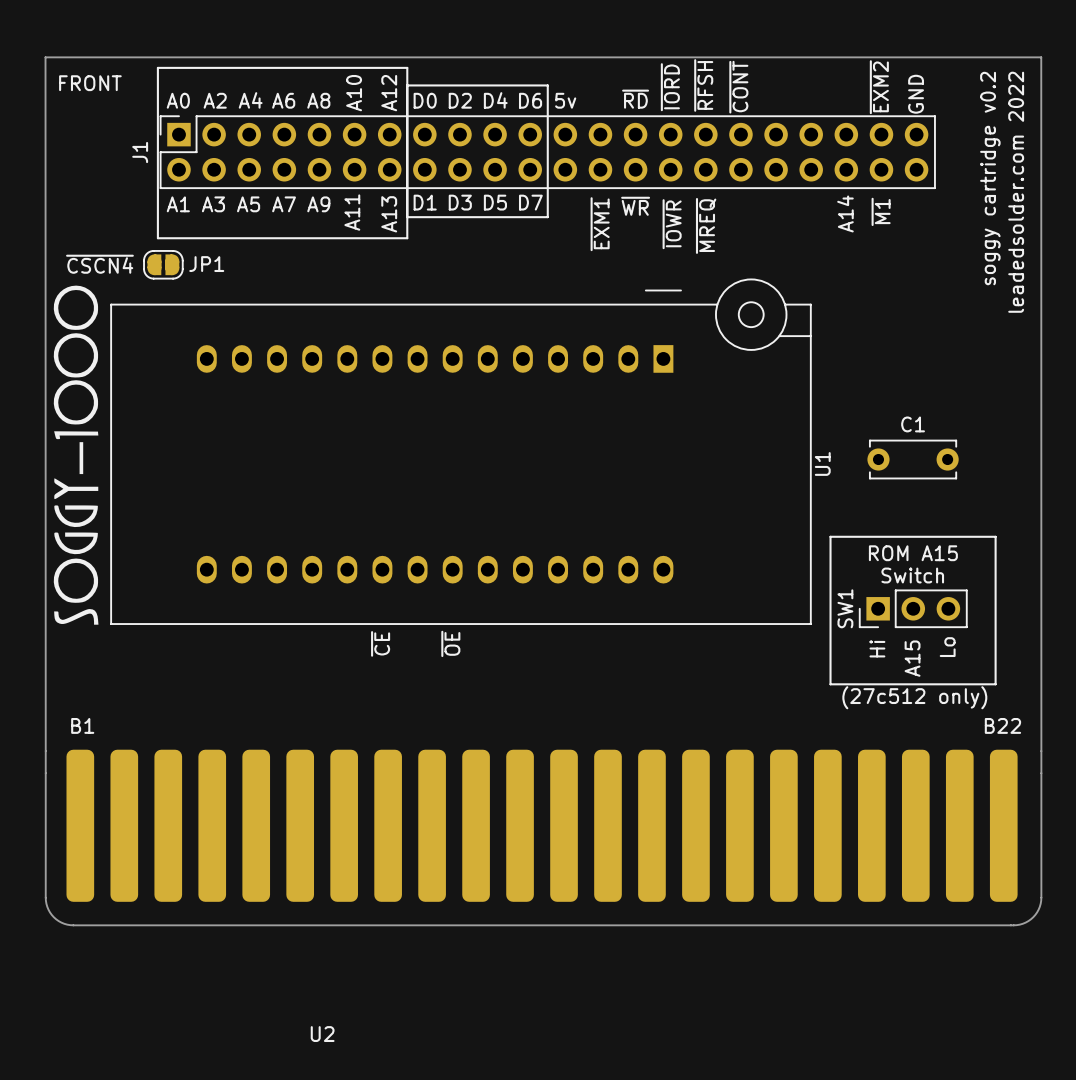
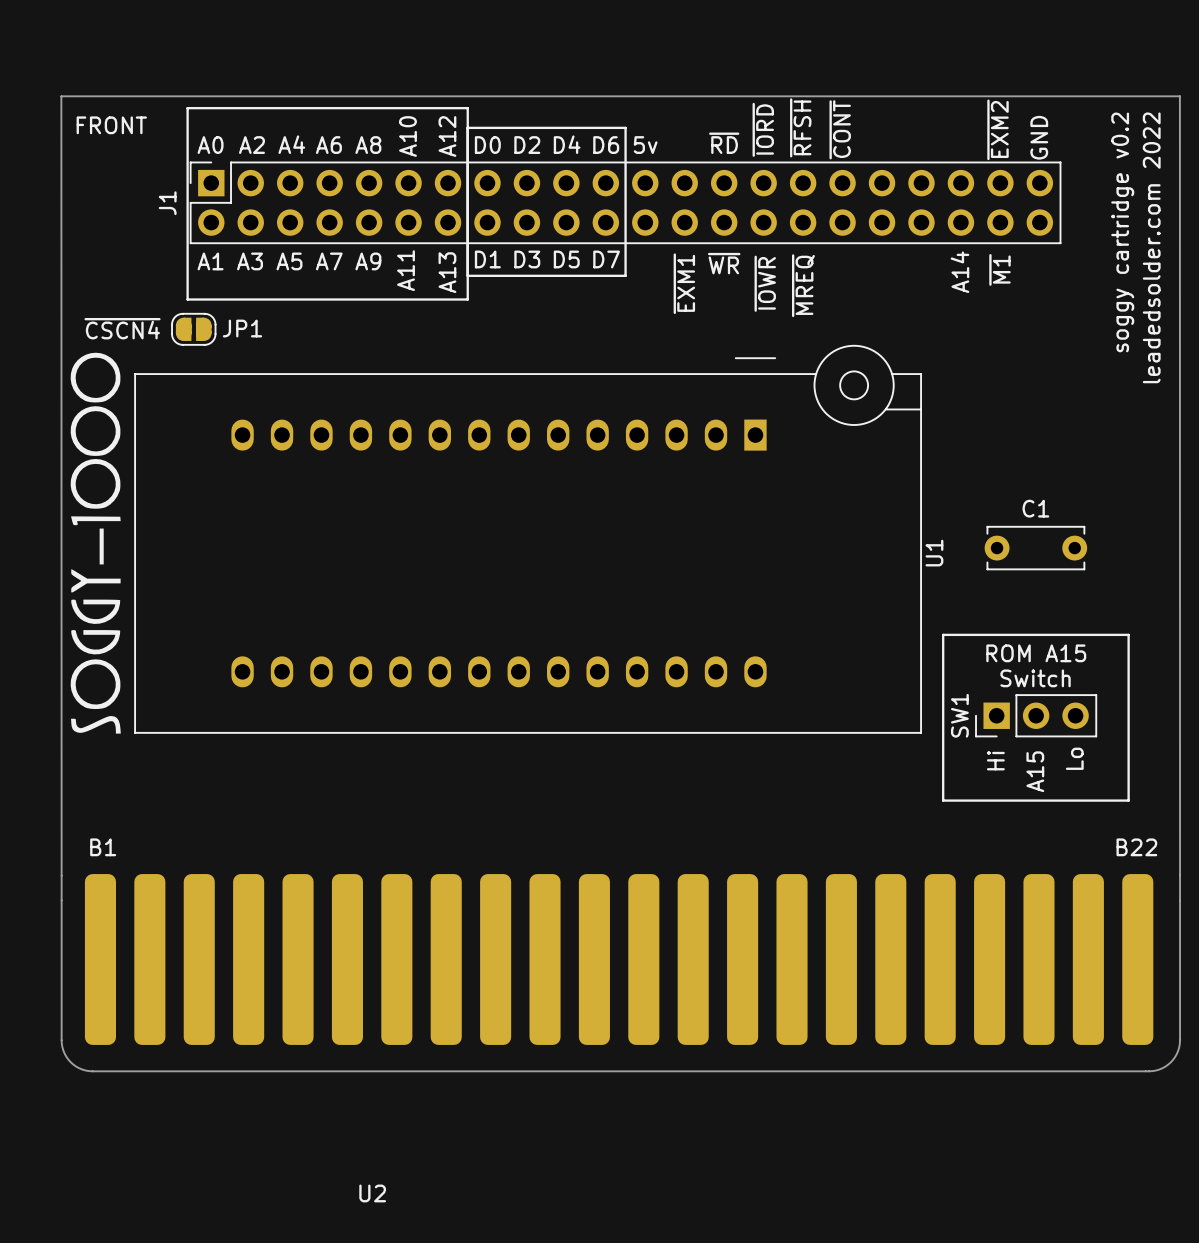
text: ~{CE} (380, 643) -> none
text: ~{OE} (450, 643) -> none
text: (27c512 only) (914, 697) -> none

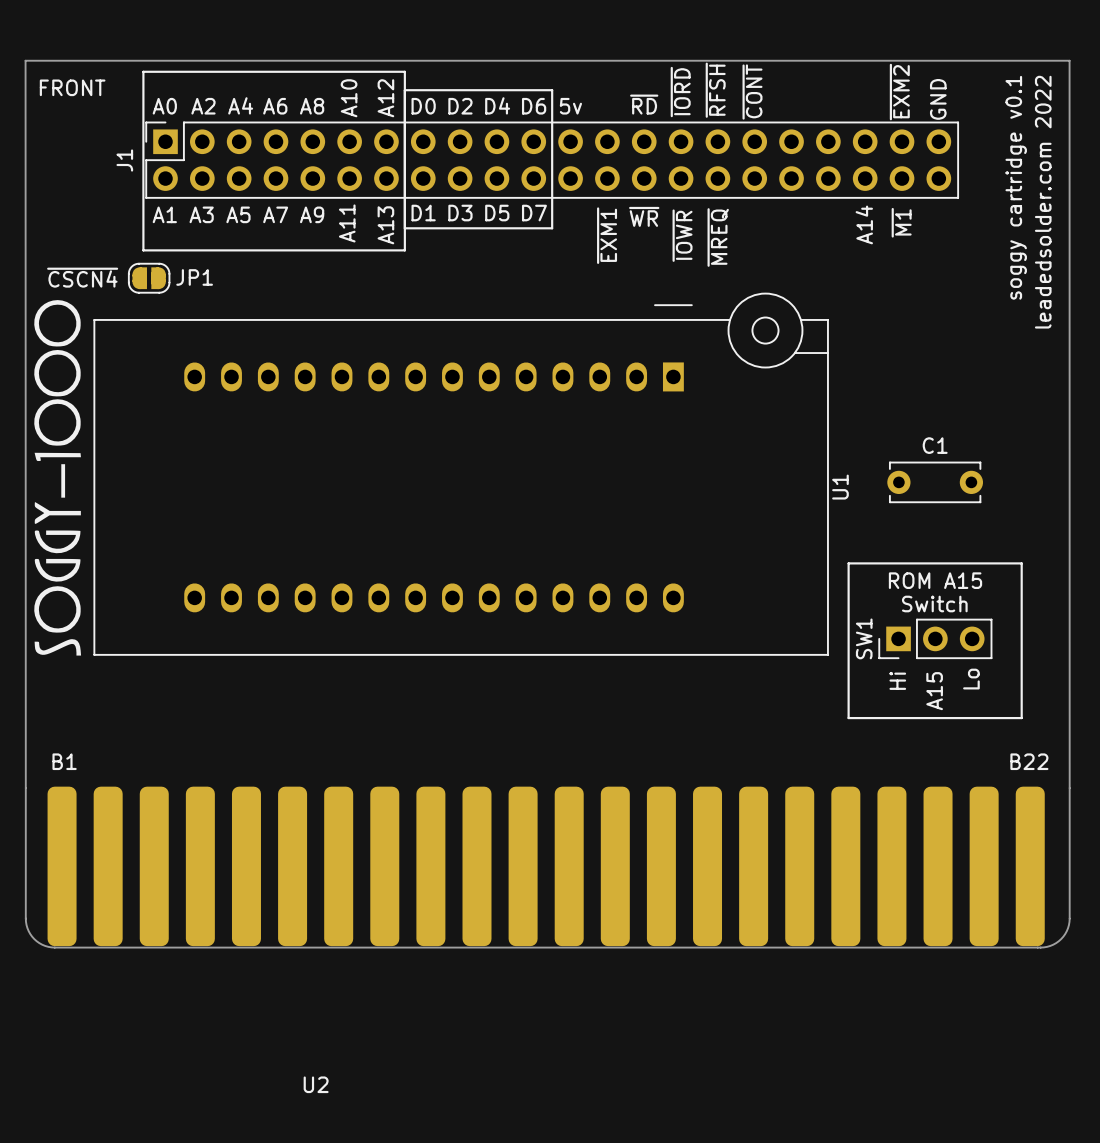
text: soggy cartridge v0.2 (1122, 232) -> soggy cartridge v0.1 (1016, 187)
U2 footprint: [60, 874, 1181, 1073] -> [24, 786, 1071, 949]

